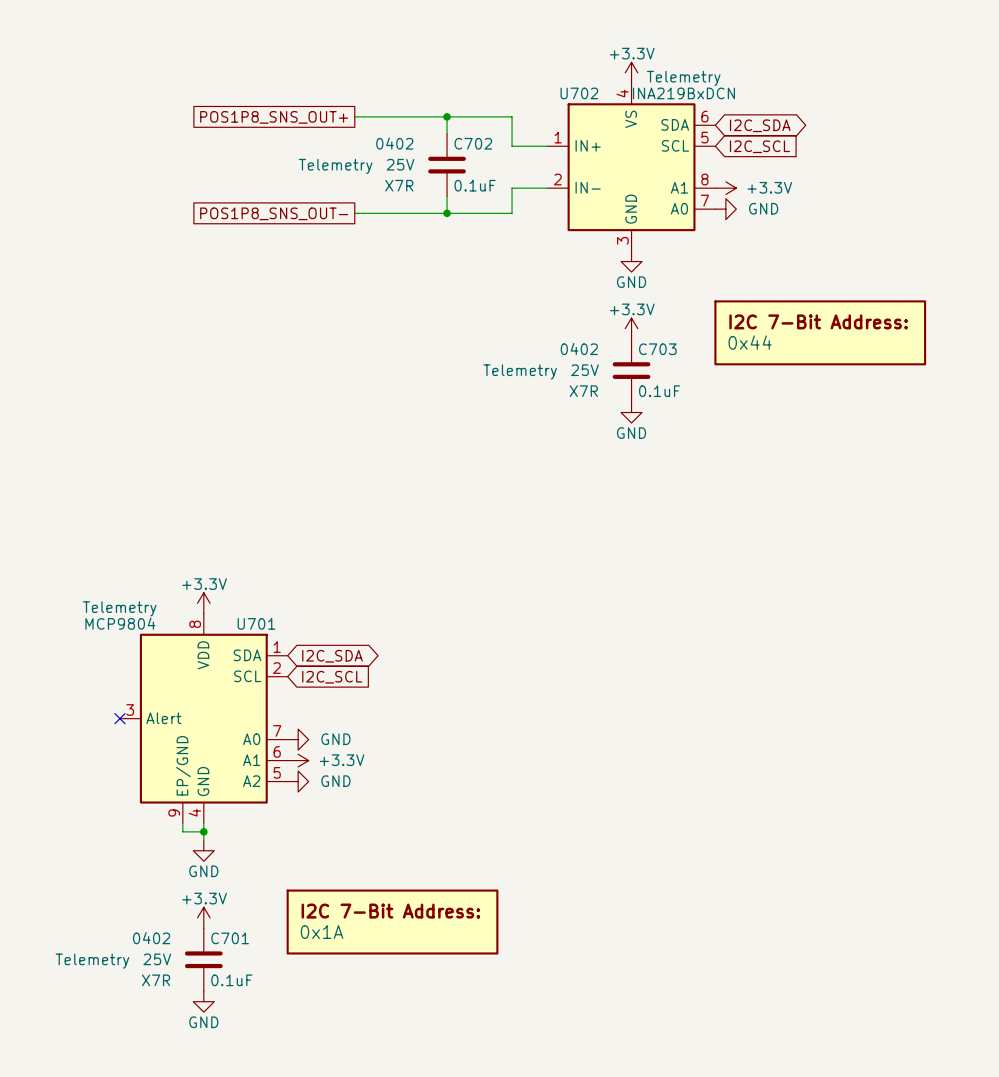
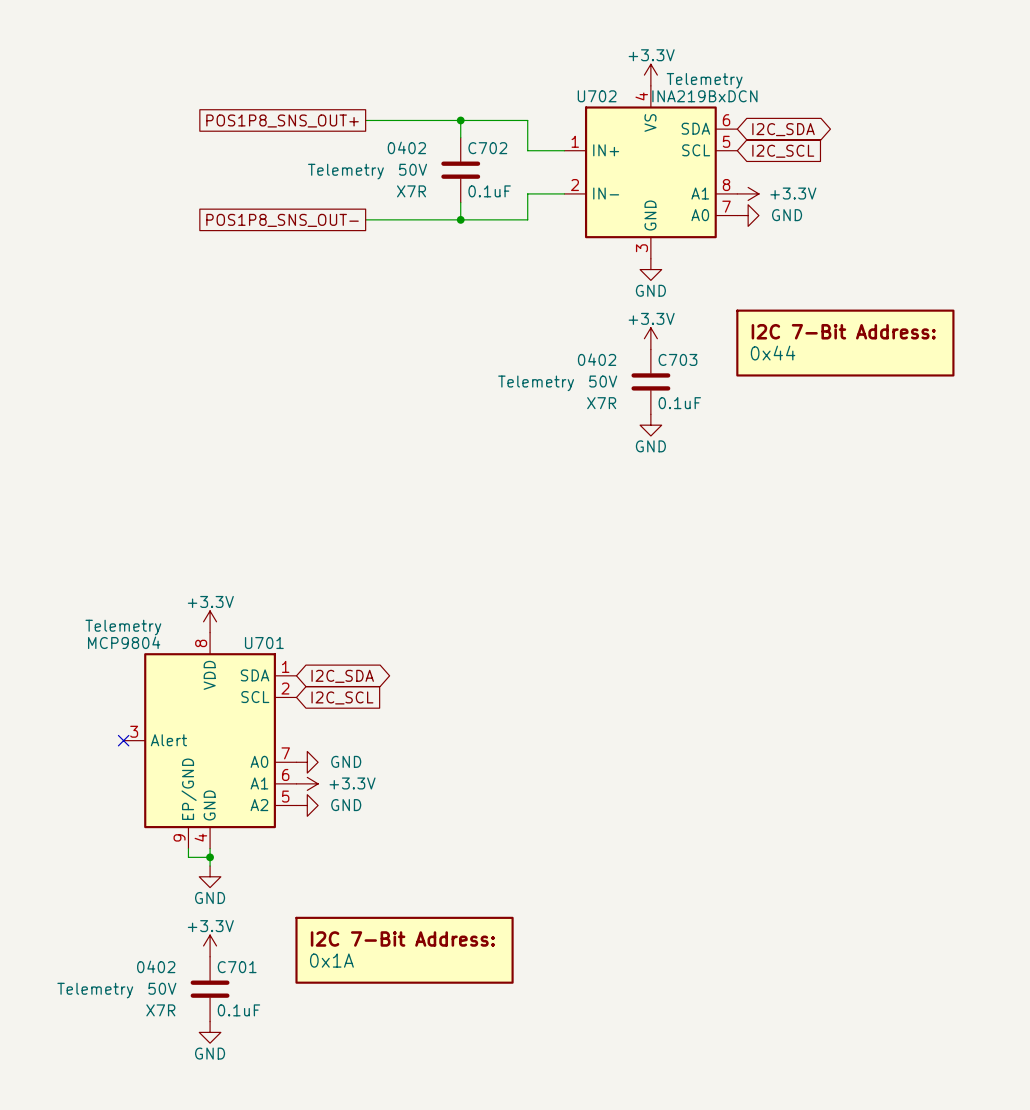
C702 text: 25V (400, 164) -> 50V (413, 169)
C703 text: 25V (585, 370) -> 50V (603, 381)
C701 text: 25V (157, 959) -> 50V (162, 988)

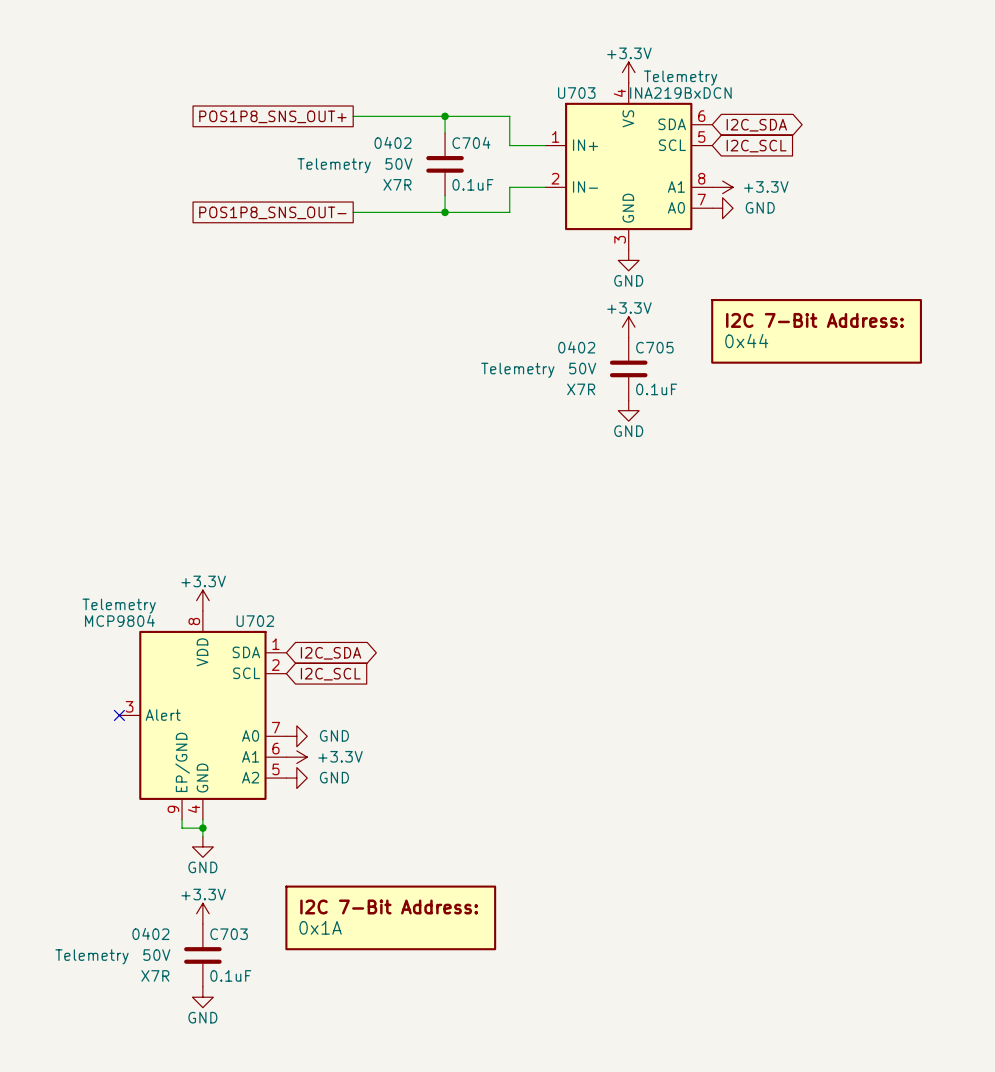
U702 name: U702 (597, 96) -> U703 (576, 93)
C702 name: C702 (487, 148) -> C704 (471, 142)
C703 name: C703 (677, 359) -> C705 (654, 347)
U701 name: U701 (264, 643) -> U702 (255, 621)
C701 name: C701 (237, 967) -> C703 (229, 934)

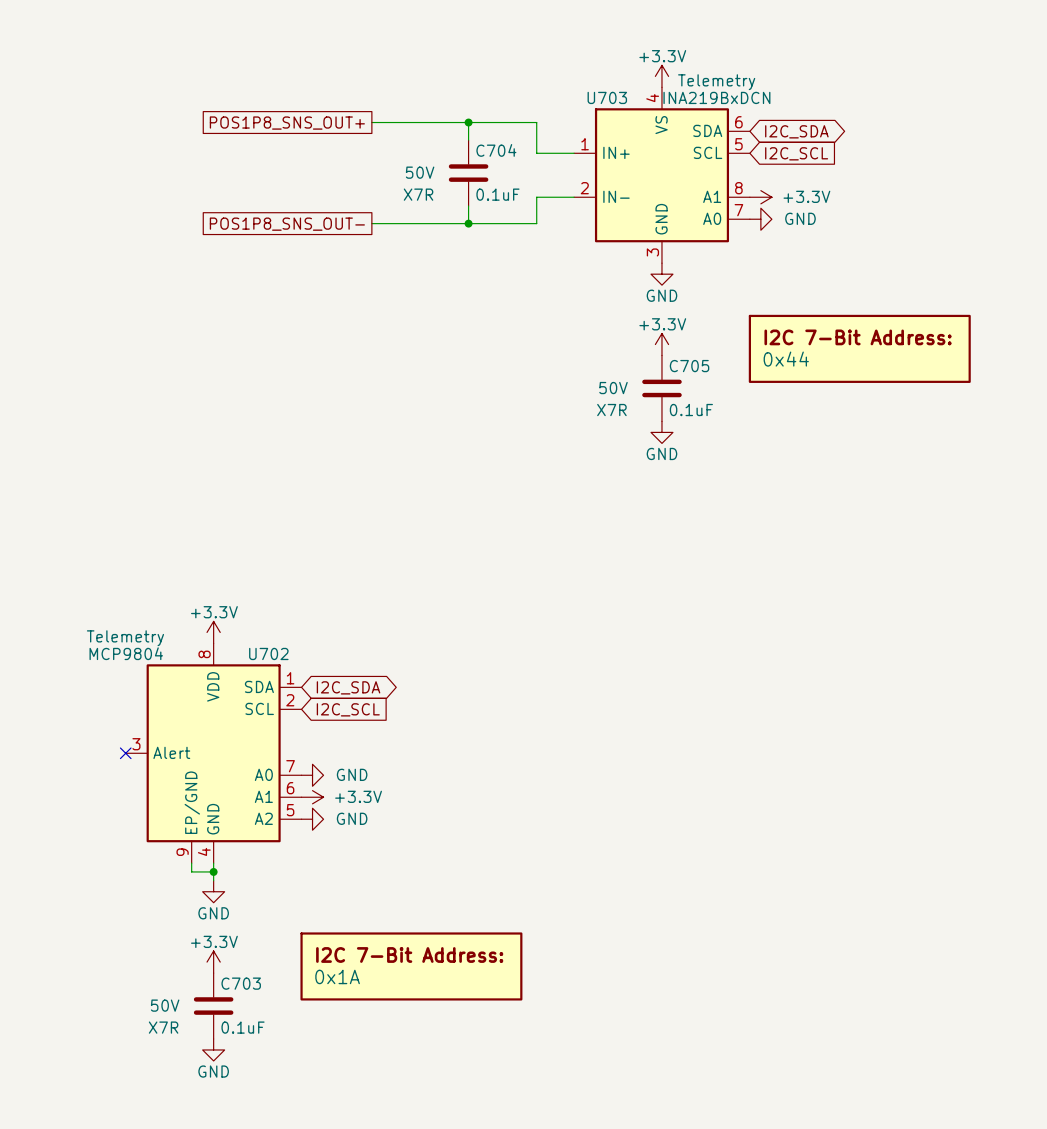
C704 text: 0402 (393, 142) -> none
C704 text: Telemetry (334, 165) -> none
C705 text: 0402 (576, 347) -> none
C705 text: Telemetry (517, 370) -> none
C703 text: 0402 (150, 933) -> none
C703 text: Telemetry (92, 956) -> none

